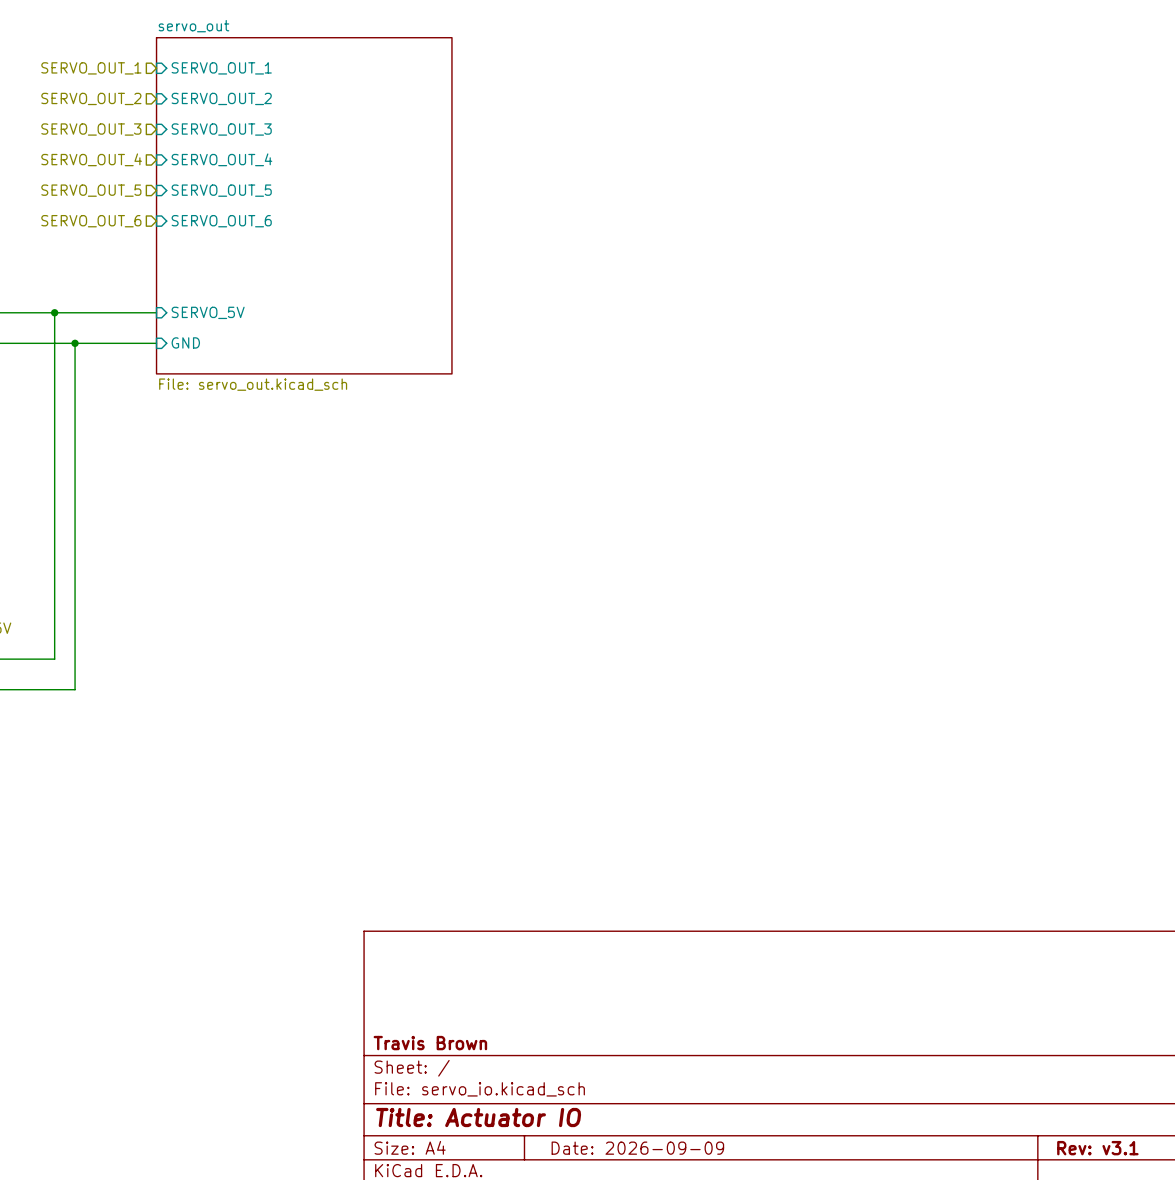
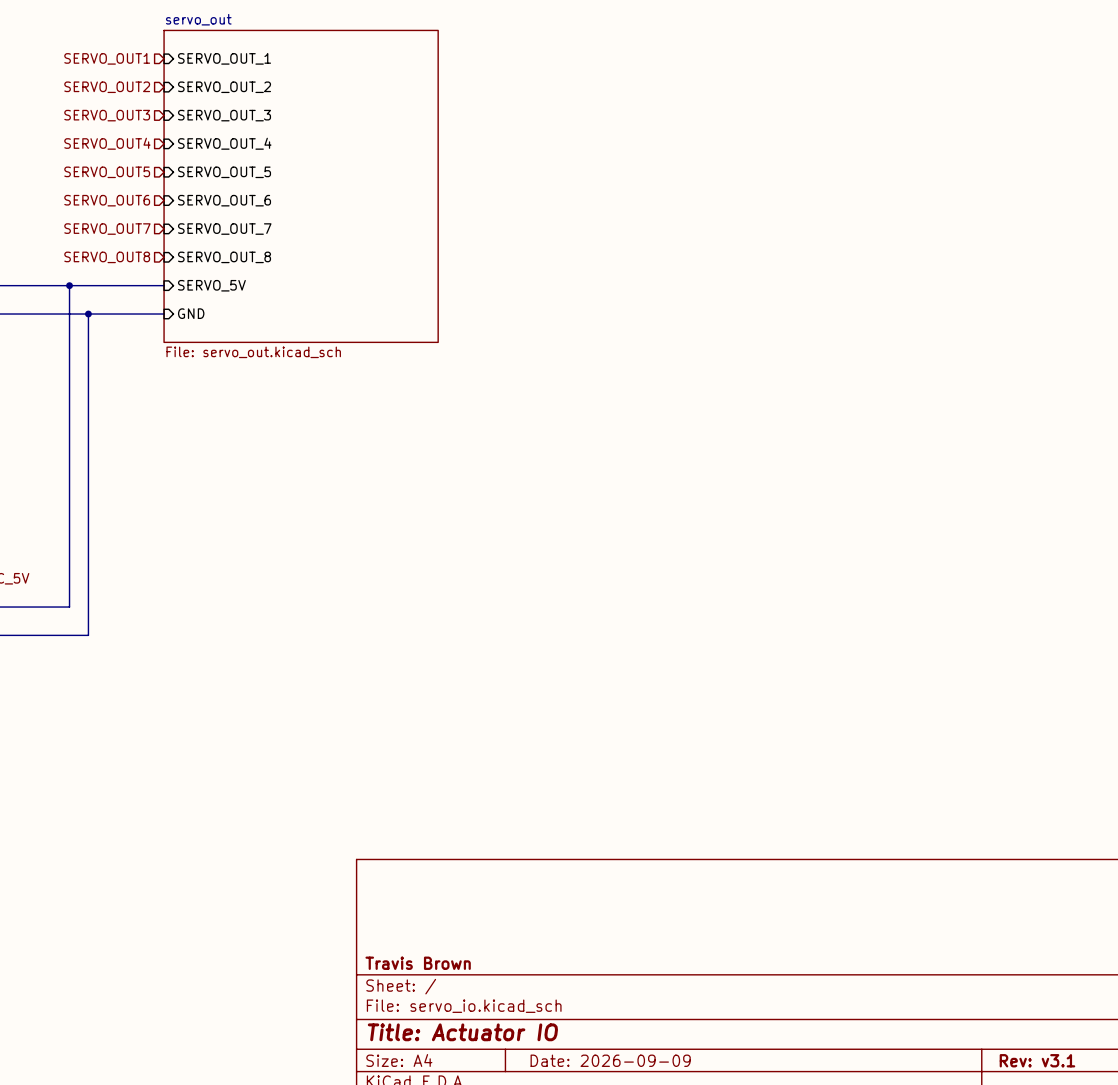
hierarchical label: SERVO_OUT_1 (91, 68) -> SERVO_OUT1 (107, 58)
hierarchical label: SERVO_OUT_2 (91, 98) -> SERVO_OUT2 (107, 87)
hierarchical label: SERVO_OUT_3 (91, 129) -> SERVO_OUT3 (107, 115)
hierarchical label: SERVO_OUT_4 (91, 159) -> SERVO_OUT4 (107, 143)
hierarchical label: SERVO_OUT_5 (91, 190) -> SERVO_OUT5 (107, 172)
hierarchical label: SERVO_OUT_6 (91, 221) -> SERVO_OUT6 (107, 200)
hierarchical label: none -> SERVO_OUT7 (107, 229)
sheet pin: none -> SERVO_OUT_7 (224, 229)
hierarchical label: none -> SERVO_OUT8 (107, 257)
sheet pin: none -> SERVO_OUT_8 (224, 257)

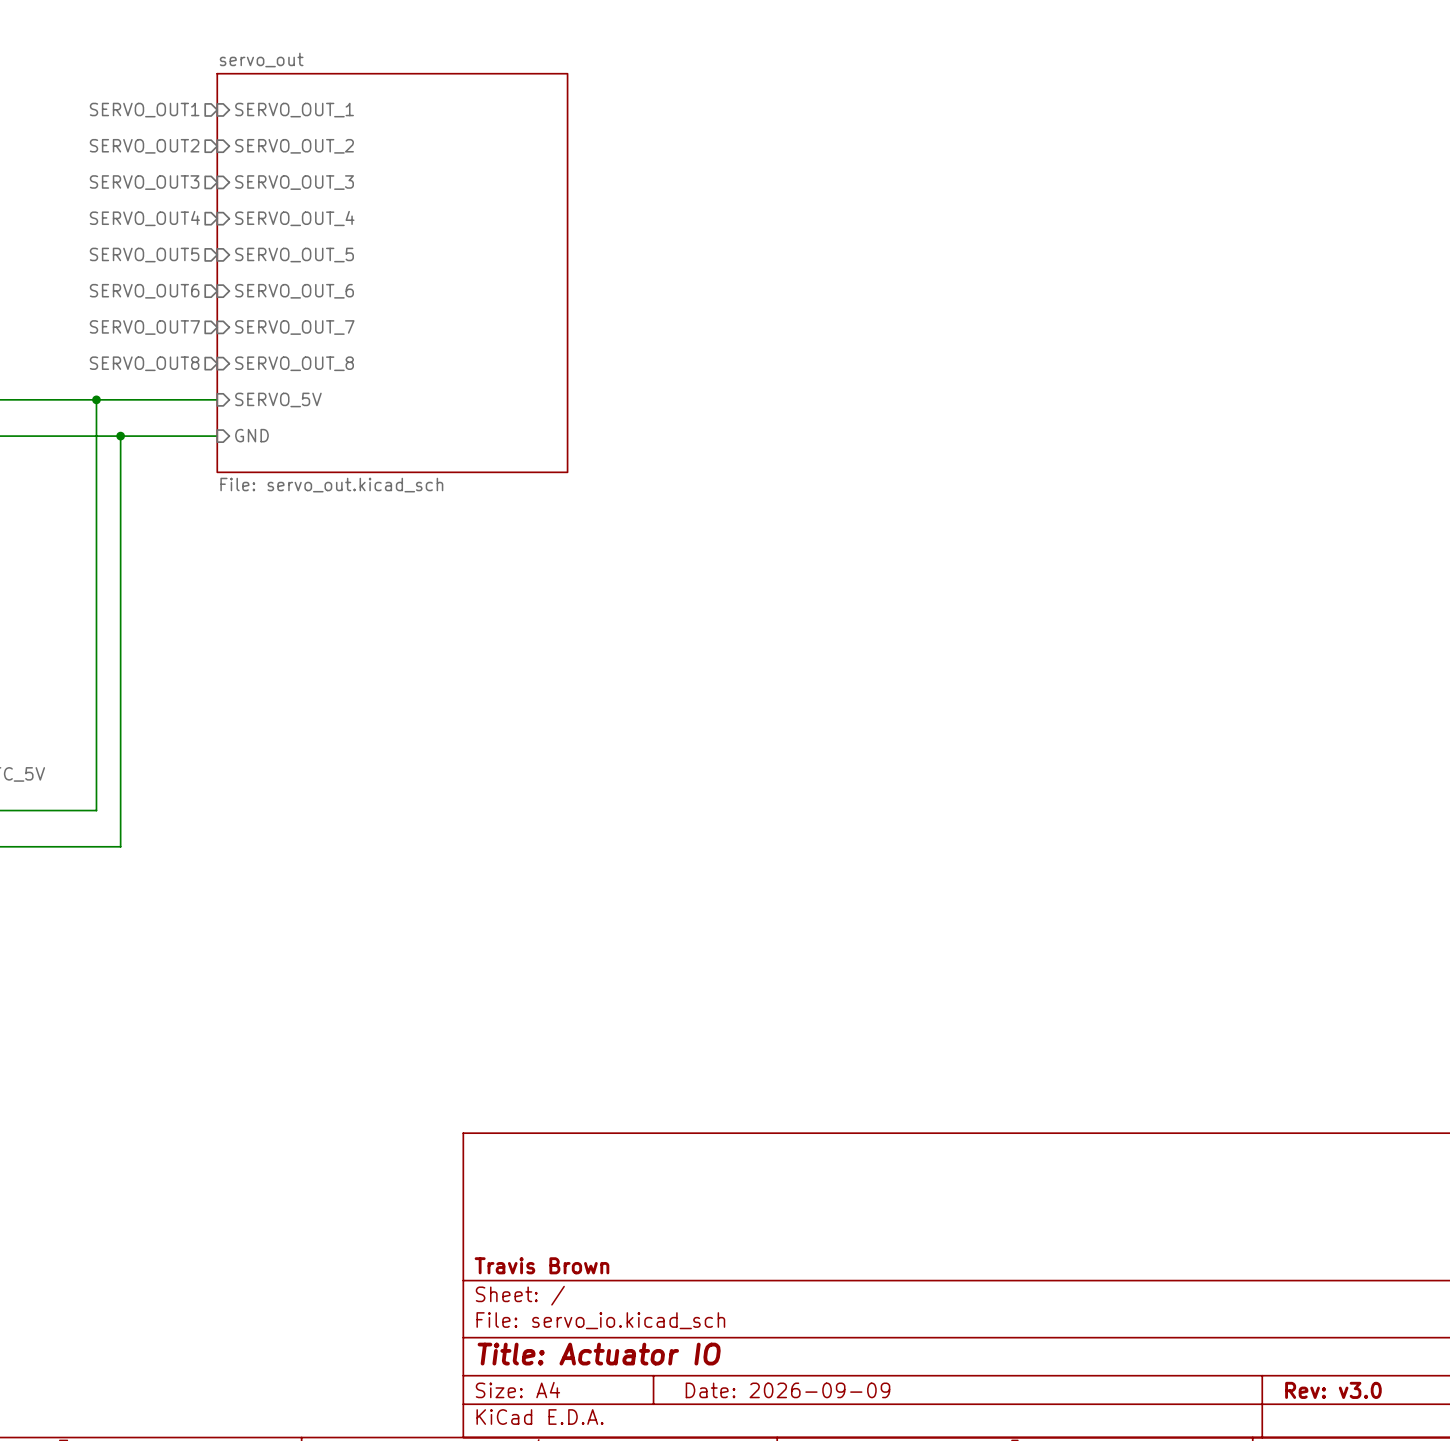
title block: Rev: v3.1 (1037, 1060) -> Rev: v3.0 (1333, 1390)

